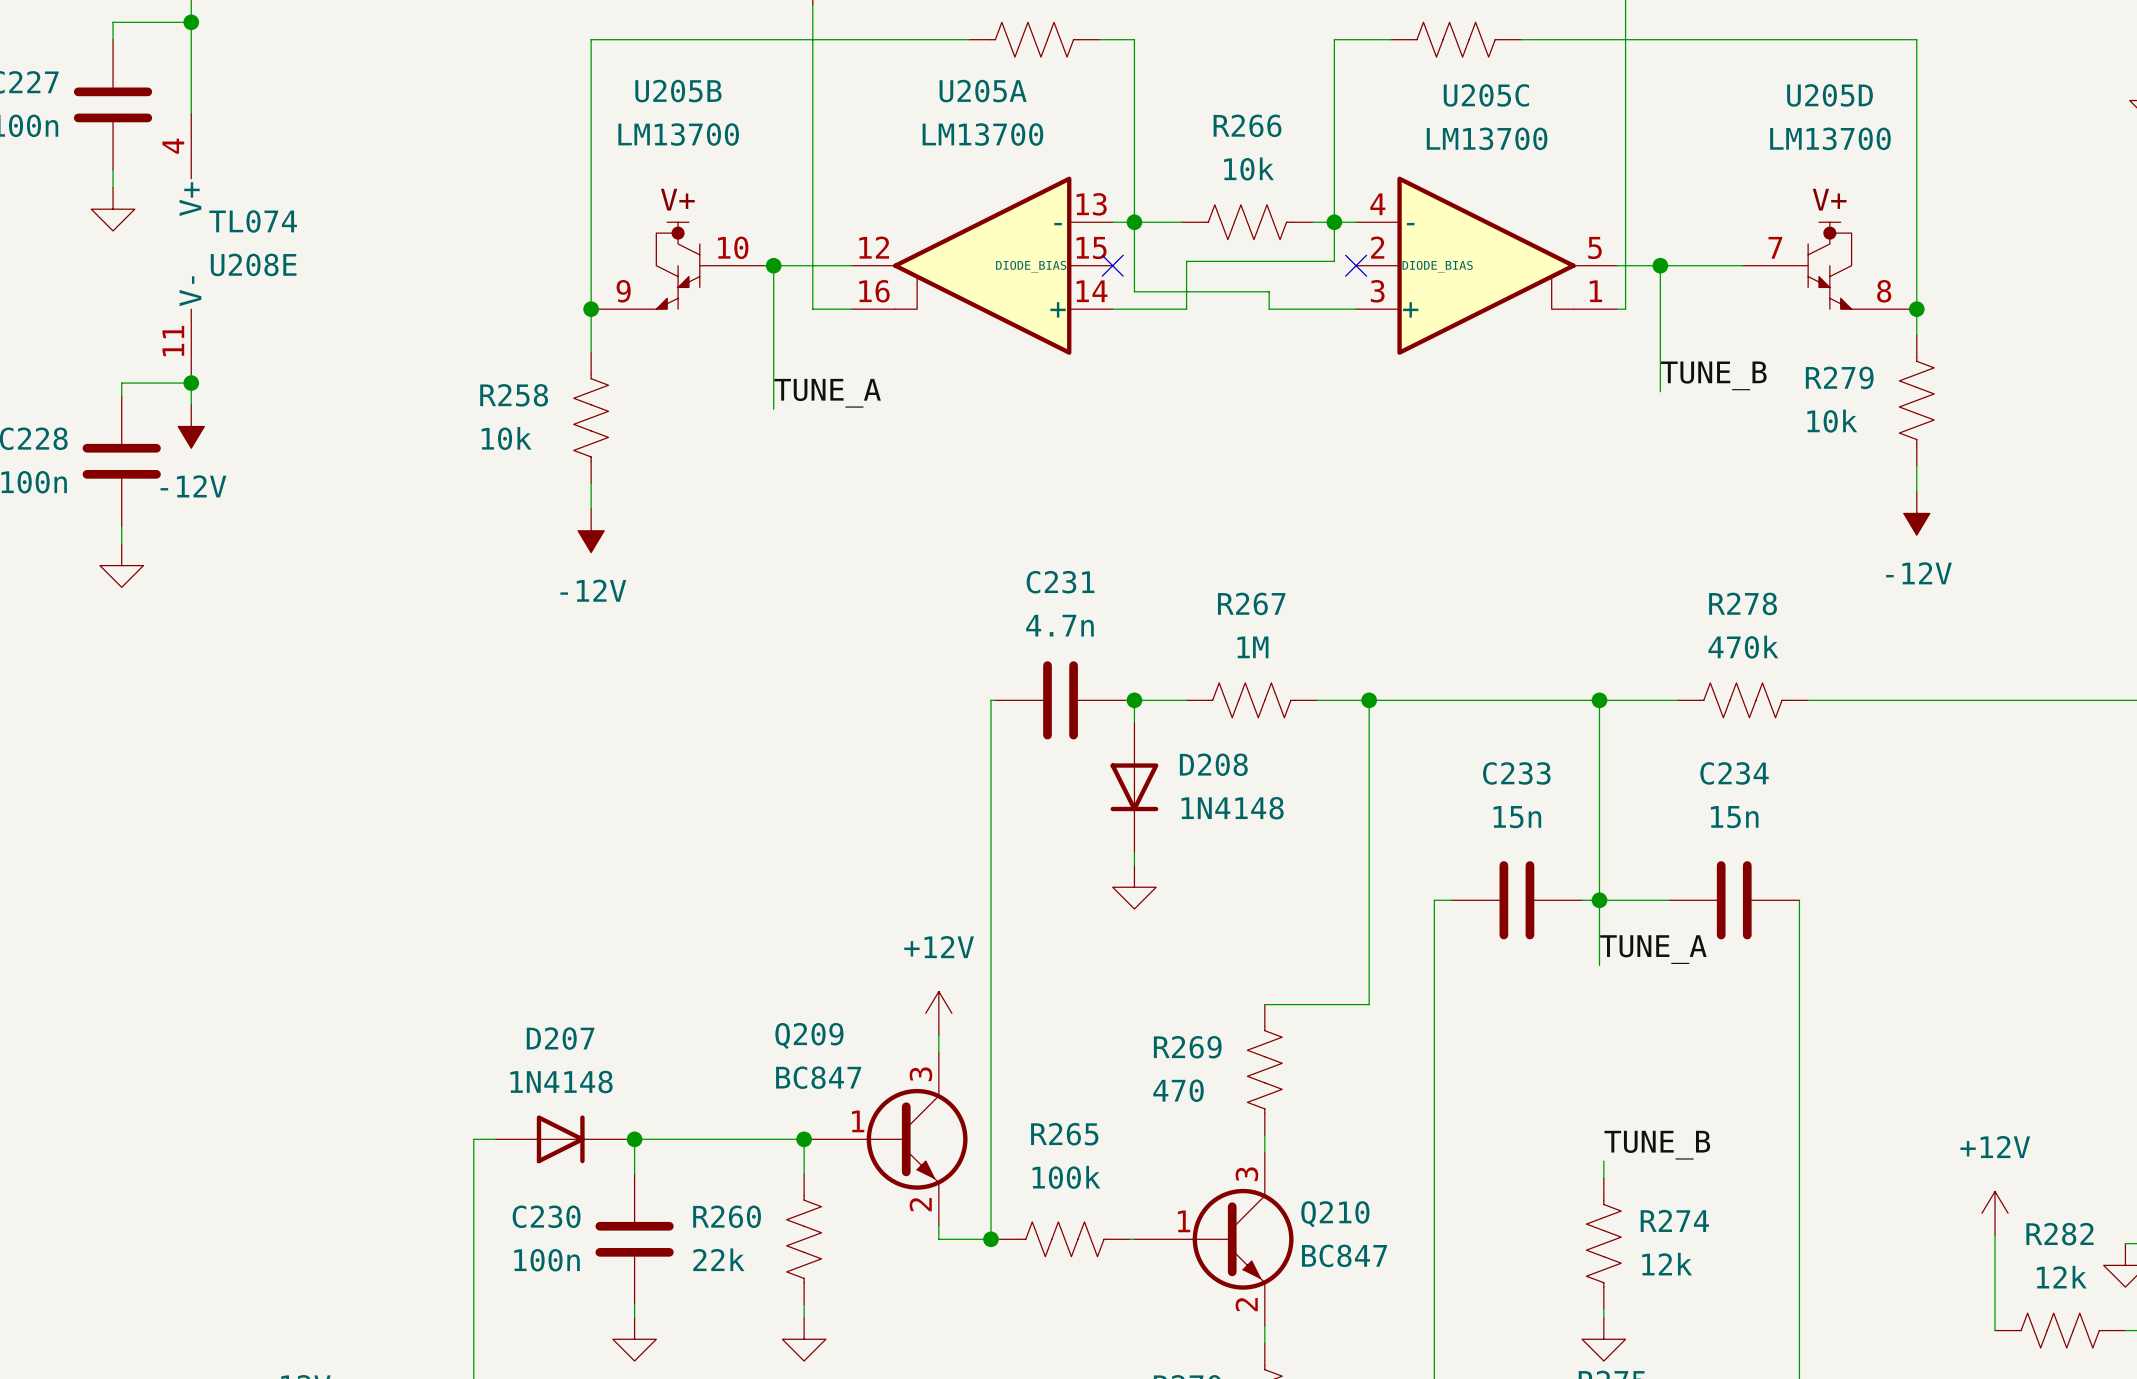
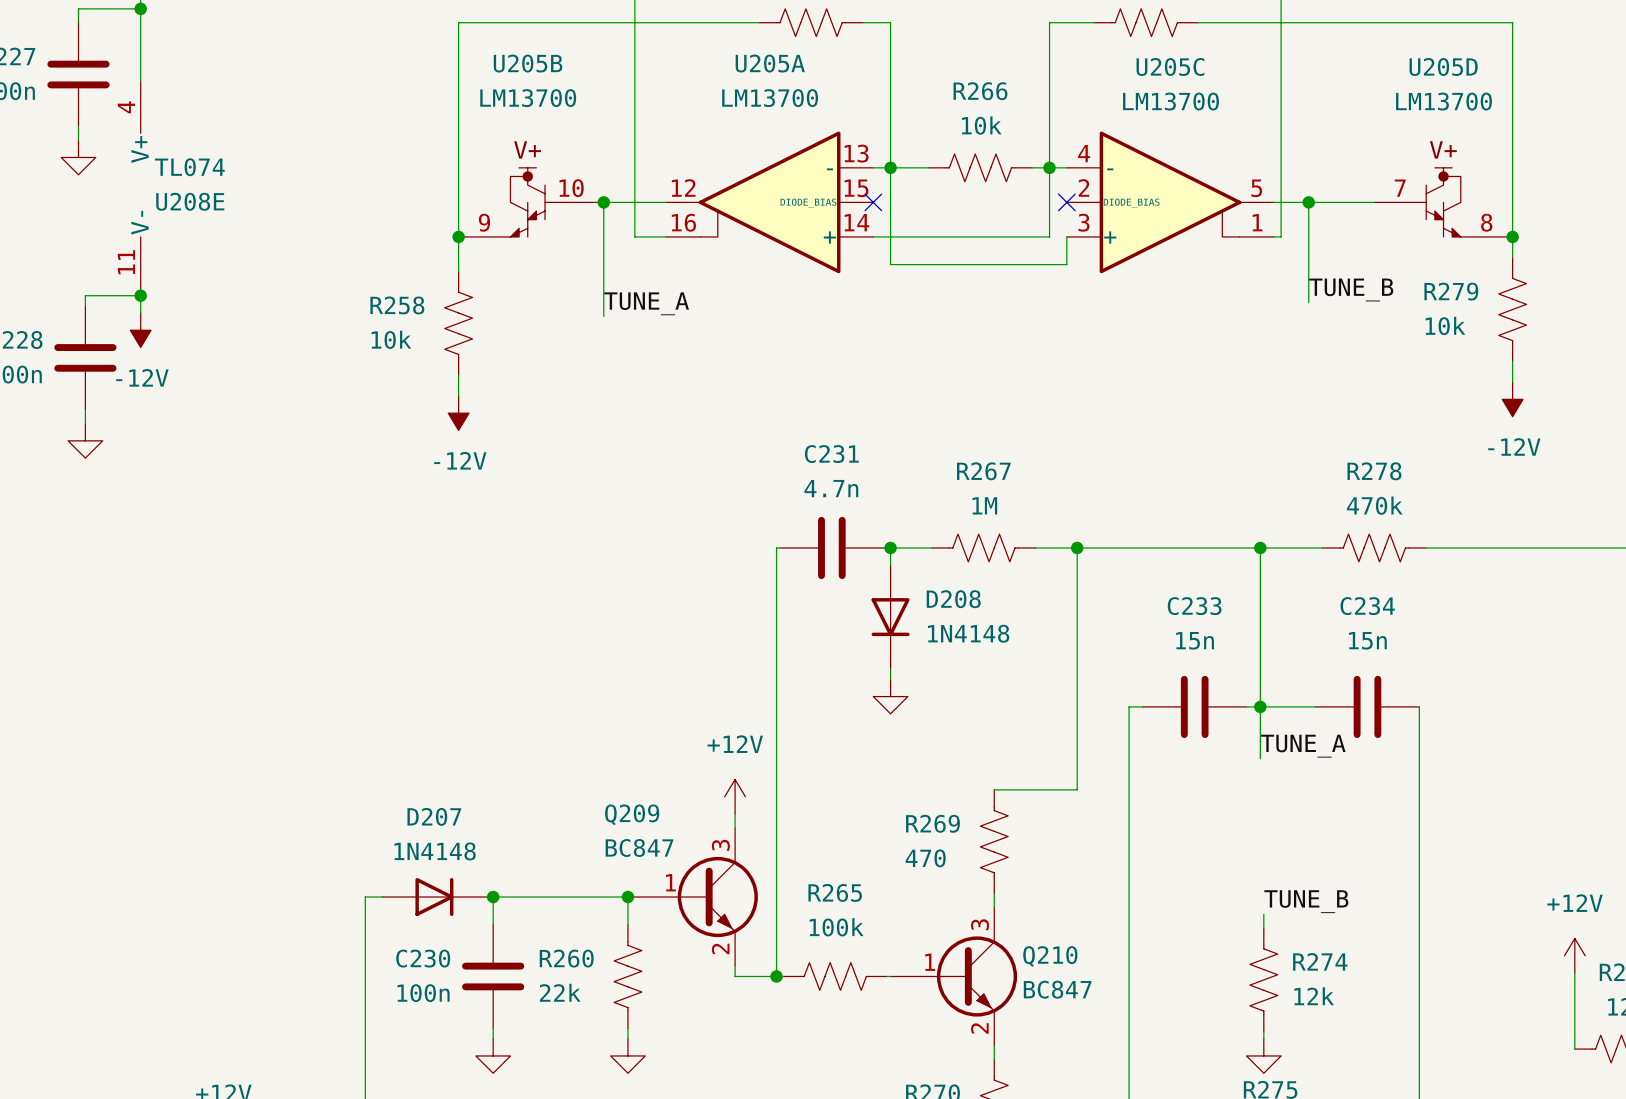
wire: (1334, 261) (1186, 261) (1186, 309) -> none
wire: (1134, 291) (1269, 291) (1269, 309) -> (932, 236) (997, 236)
wire: none -> (890, 223) (890, 264) (1066, 264) (1066, 236)
wire: (1334, 309) (1356, 309) -> (1049, 236) (1049, 198)

